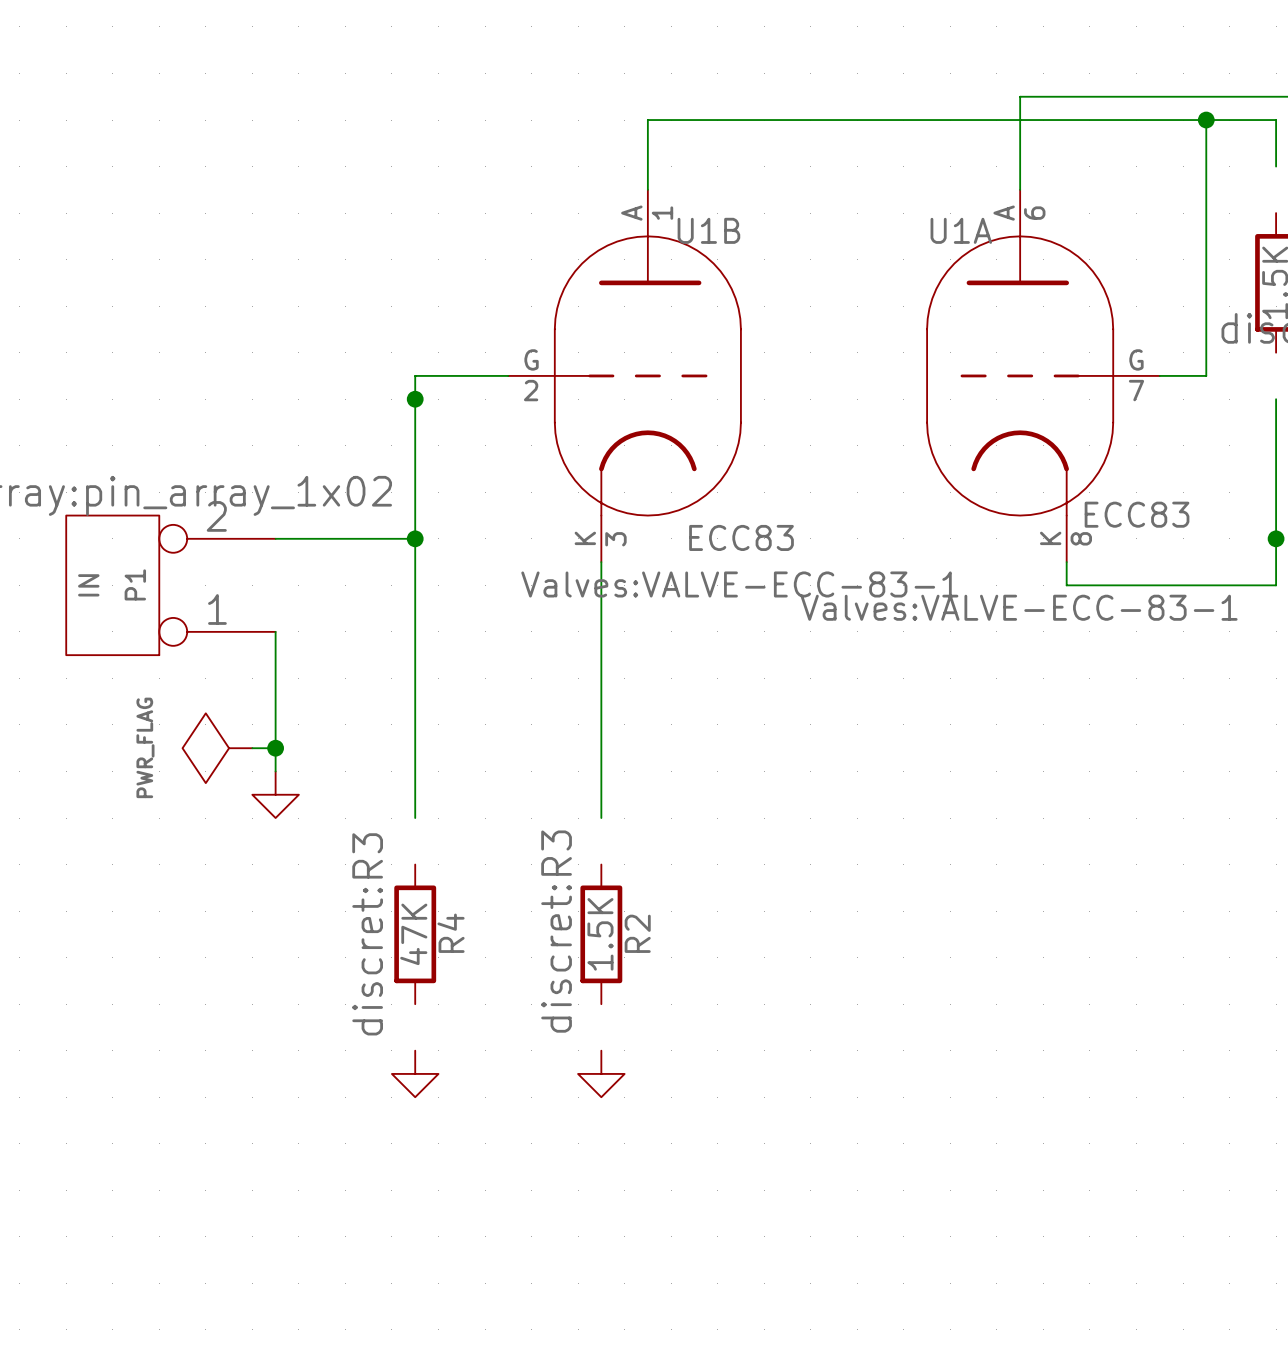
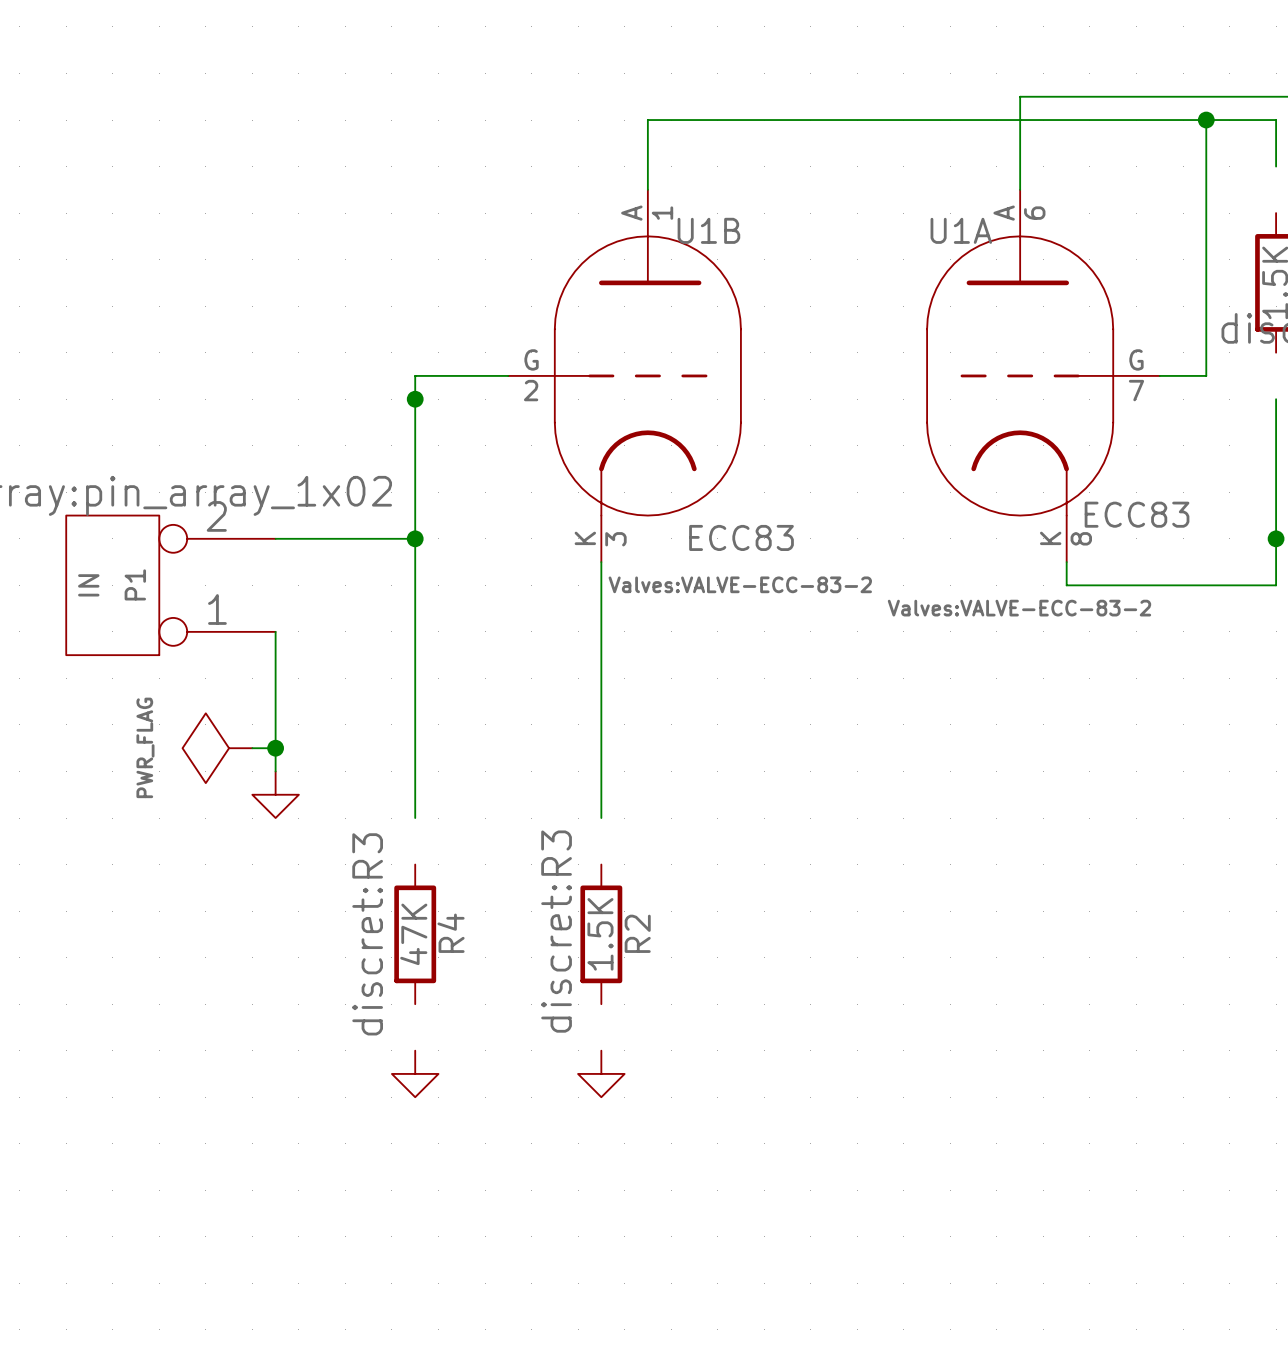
U1B text: Valves:VALVE-ECC-83-1 (739, 584) -> Valves:VALVE-ECC-83-2 (740, 584)
U1A text: Valves:VALVE-ECC-83-1 (1019, 607) -> Valves:VALVE-ECC-83-2 (1019, 608)

